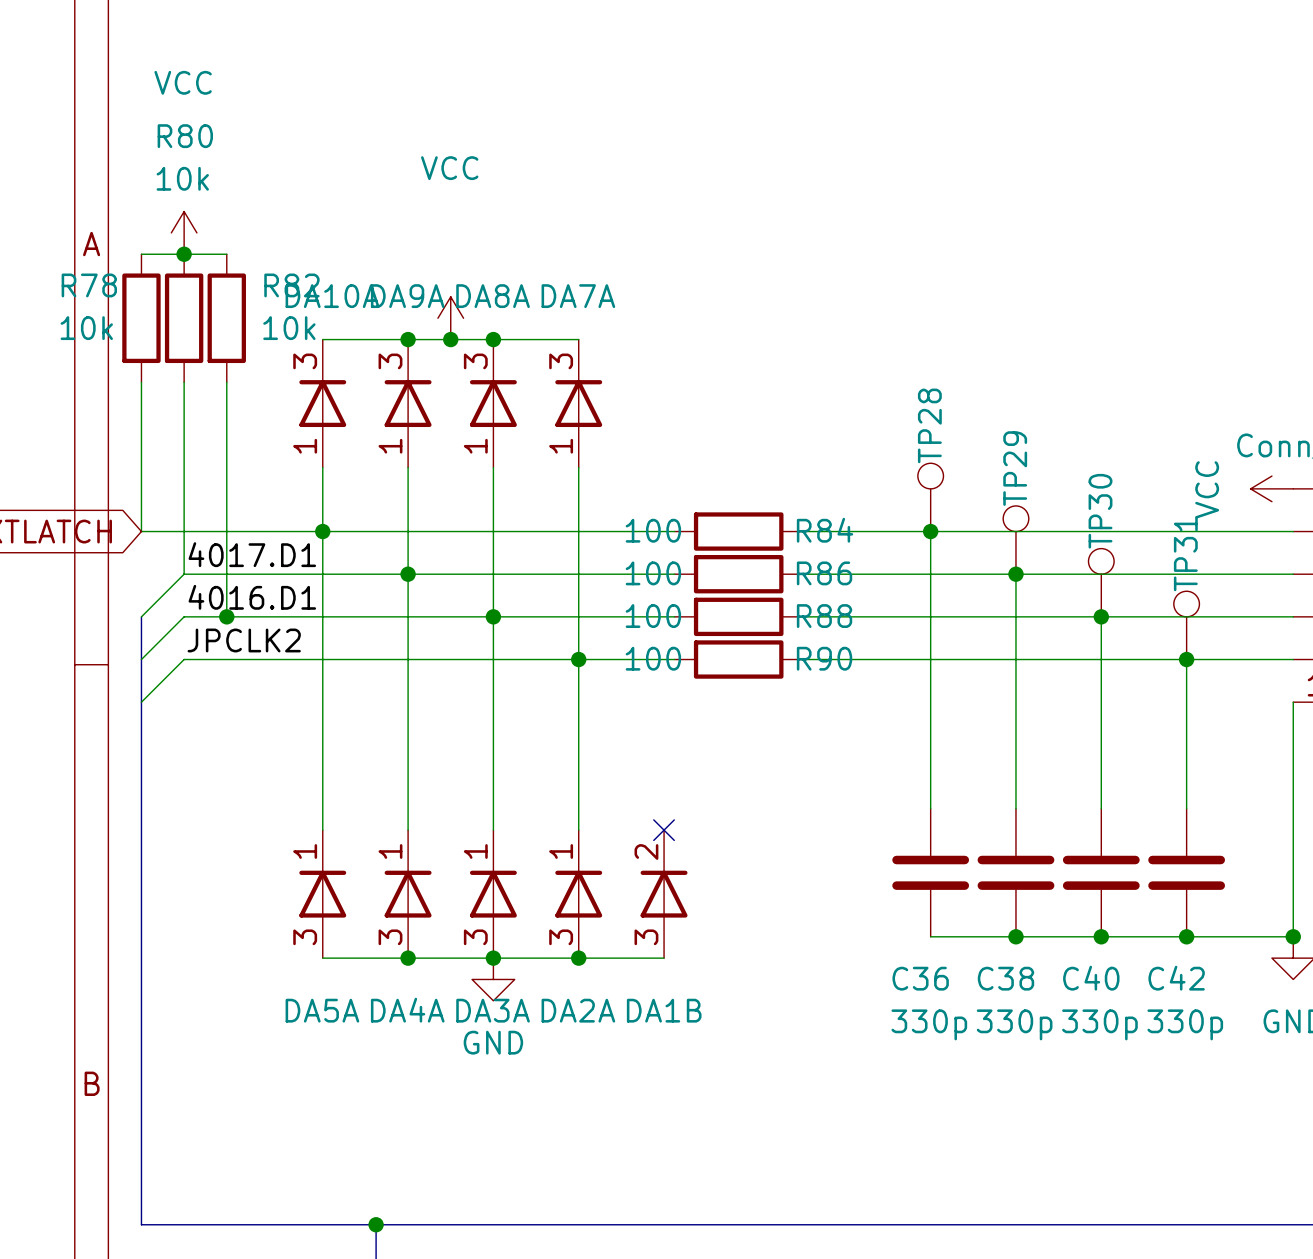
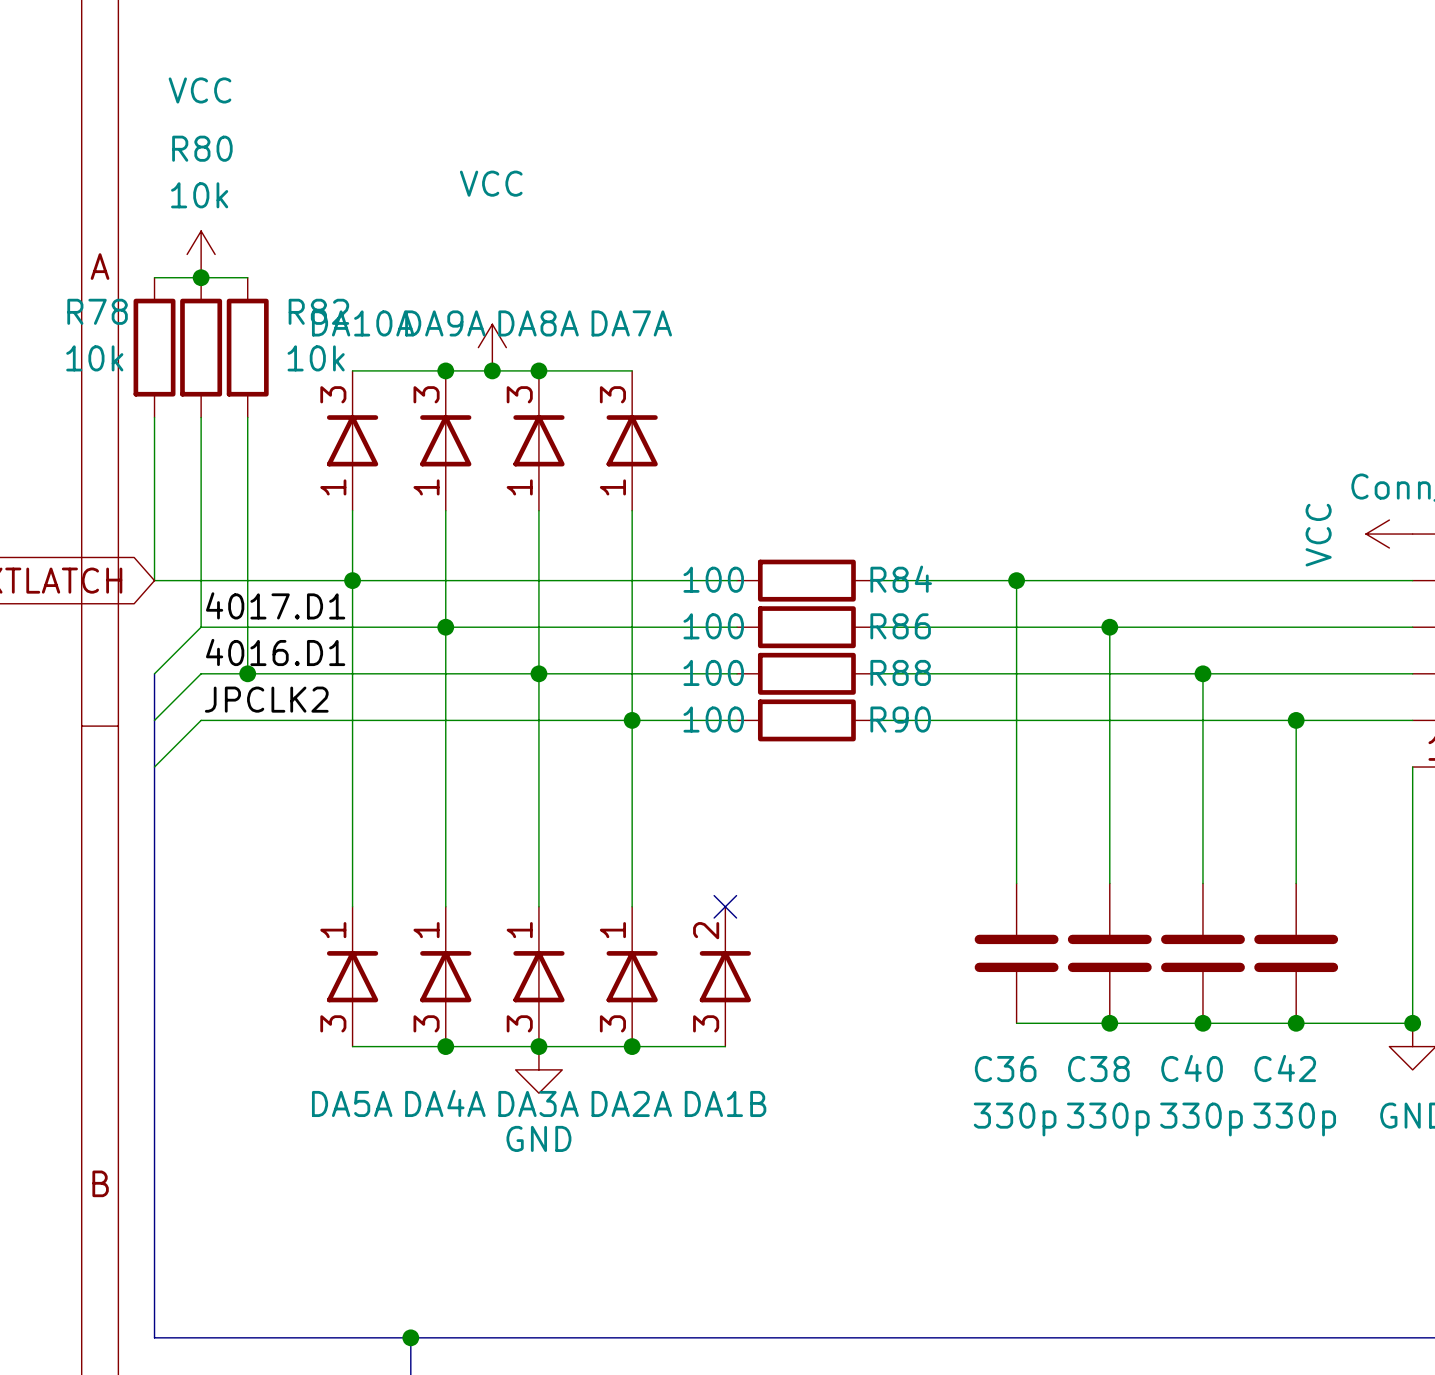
TP28: (930, 497) -> none
TP29: (1015, 540) -> none
TP30: (1101, 582) -> none
TP31: (1186, 625) -> none

